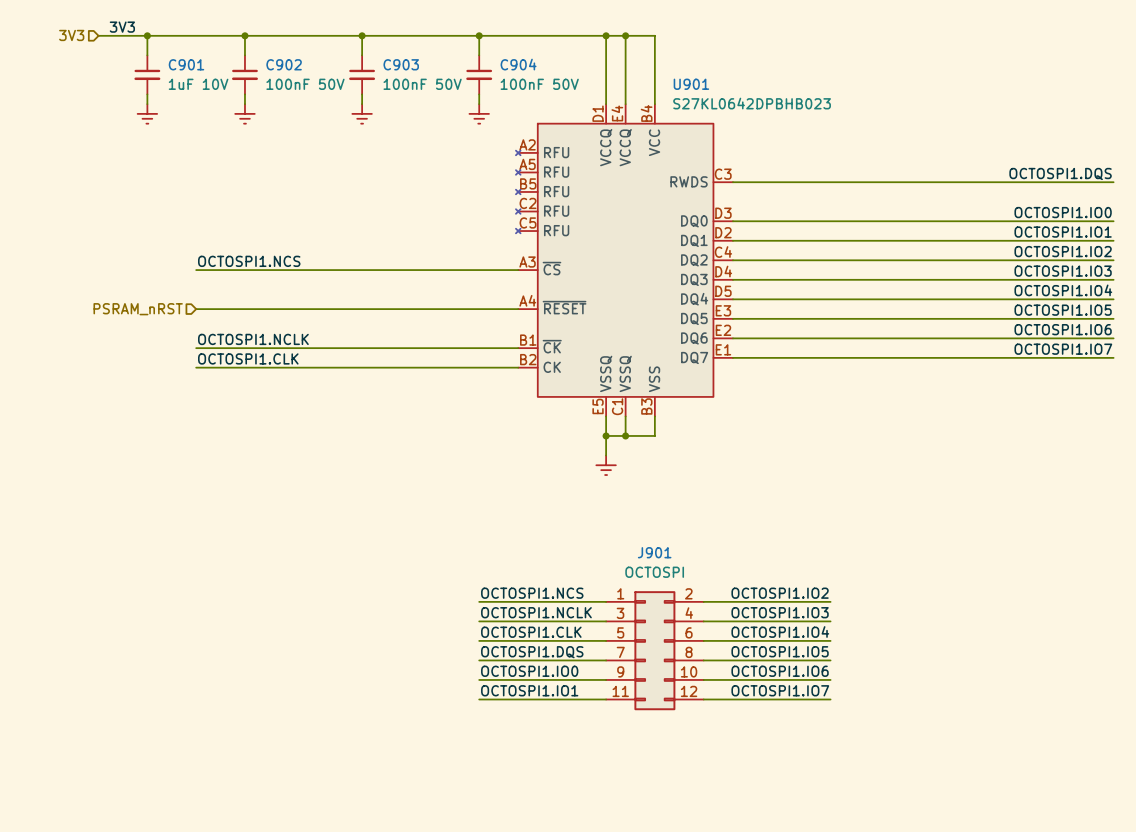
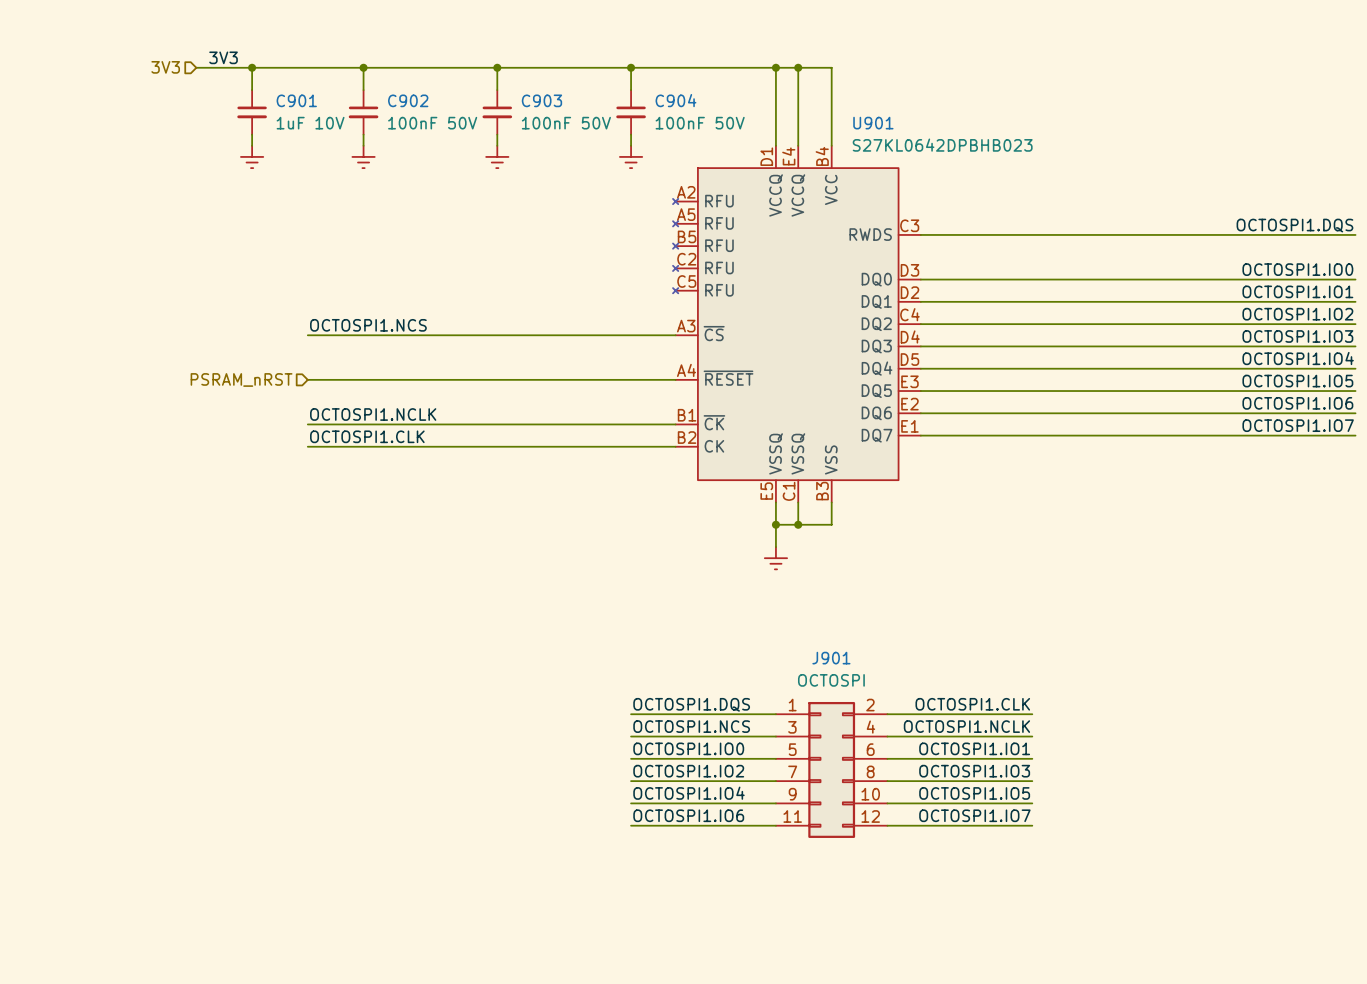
label: OCTOSPI1.NCS (532, 593) -> OCTOSPI1.DQS (691, 704)
label: OCTOSPI1.IO2 (780, 593) -> OCTOSPI1.CLK (972, 704)
label: OCTOSPI1.NCLK (536, 612) -> OCTOSPI1.NCS (691, 726)
label: OCTOSPI1.IO3 (780, 612) -> OCTOSPI1.NCLK (966, 726)
label: OCTOSPI1.IO4 (780, 631) -> OCTOSPI1.IO1 (974, 748)
label: OCTOSPI1.CLK (531, 632) -> OCTOSPI1.IO0 (688, 748)
label: OCTOSPI1.IO5 (780, 651) -> OCTOSPI1.IO3 (974, 771)
label: OCTOSPI1.DQS (532, 652) -> OCTOSPI1.IO2 (688, 771)
label: OCTOSPI1.IO0 (529, 671) -> OCTOSPI1.IO4 (688, 793)
label: OCTOSPI1.IO6 (780, 671) -> OCTOSPI1.IO5 (974, 793)
label: OCTOSPI1.IO1 (529, 690) -> OCTOSPI1.IO6 (688, 815)

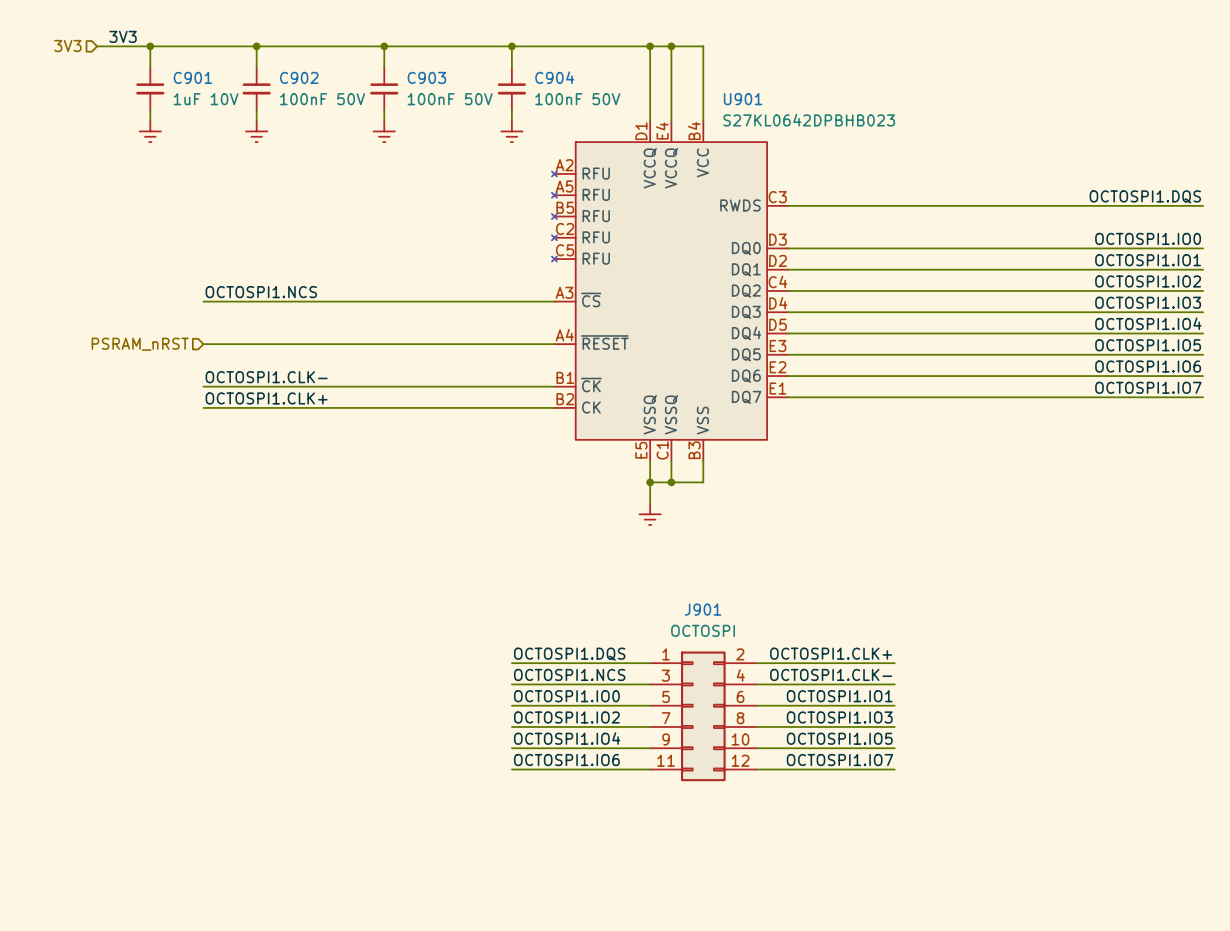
label: OCTOSPI1.NCLK (373, 414) -> OCTOSPI1.CLK- (266, 377)
label: OCTOSPI1.CLK (367, 436) -> OCTOSPI1.CLK+ (266, 398)
label: OCTOSPI1.CLK (972, 704) -> OCTOSPI1.CLK+ (831, 653)
label: OCTOSPI1.NCLK (966, 726) -> OCTOSPI1.CLK- (831, 674)

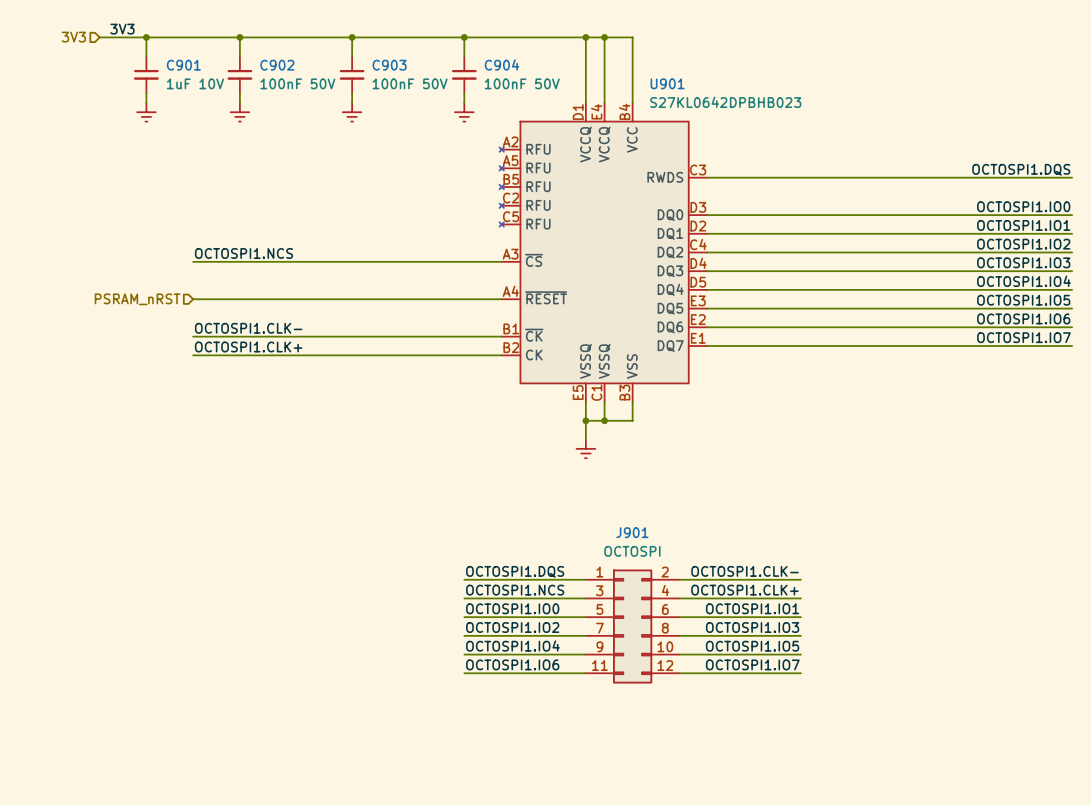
label: OCTOSPI1.CLK+ (831, 653) -> OCTOSPI1.CLK- (744, 571)
label: OCTOSPI1.CLK- (831, 674) -> OCTOSPI1.CLK+ (744, 590)

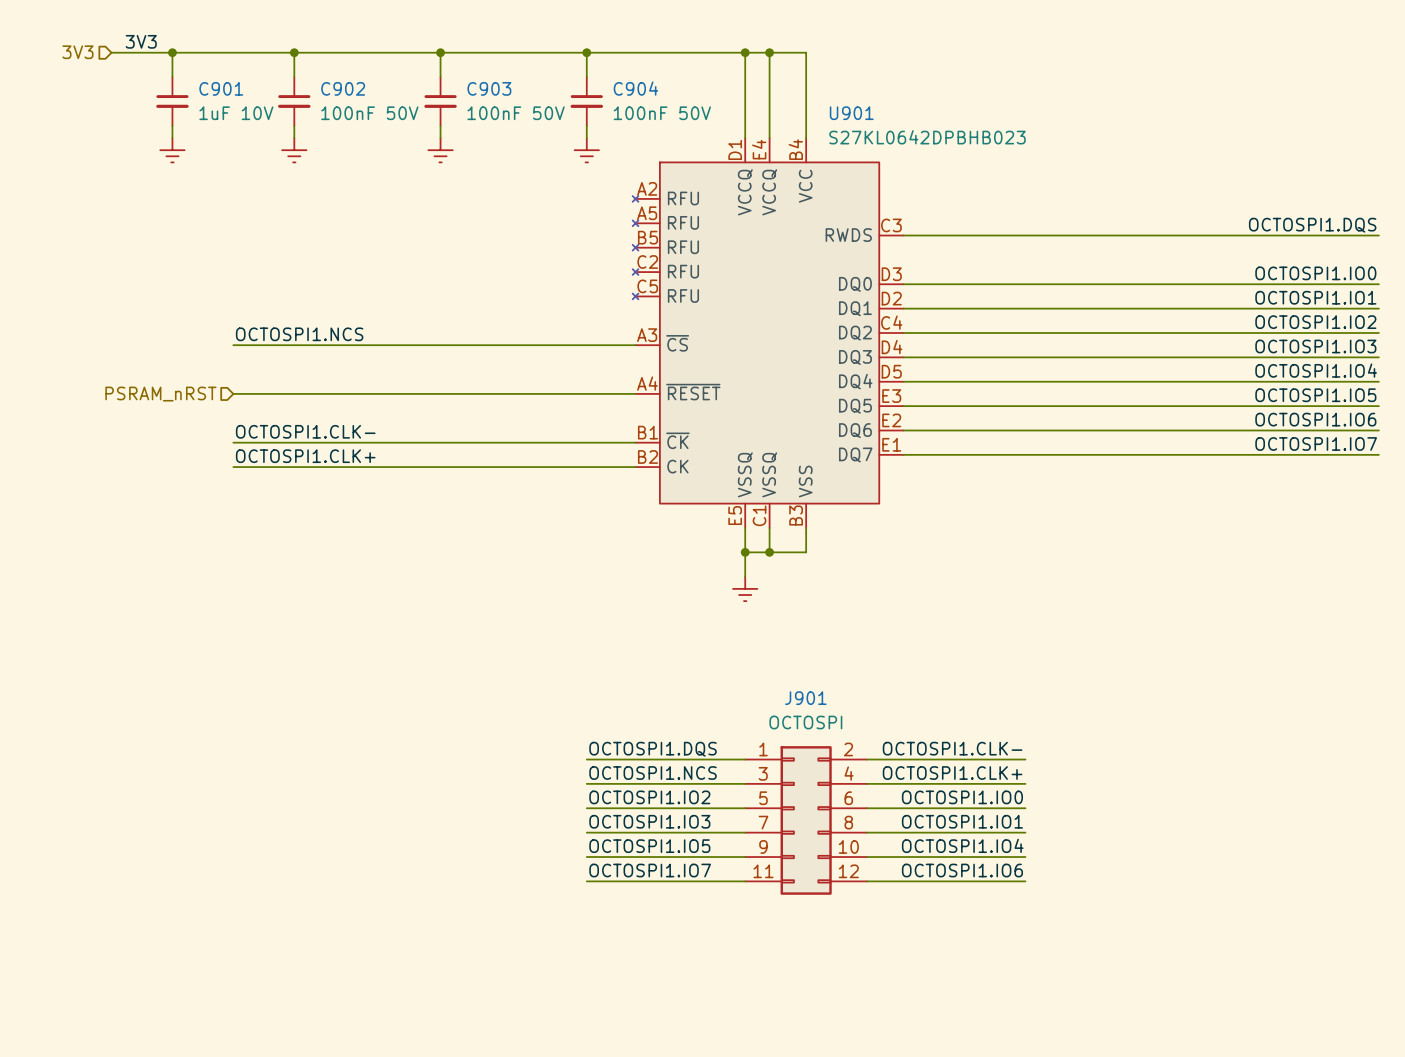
label: OCTOSPI1.IO0 (512, 608) -> OCTOSPI1.IO2 (649, 797)
label: OCTOSPI1.IO1 (752, 608) -> OCTOSPI1.IO0 (962, 797)
label: OCTOSPI1.IO2 (512, 627) -> OCTOSPI1.IO3 (649, 821)
label: OCTOSPI1.IO3 (752, 627) -> OCTOSPI1.IO1 (962, 821)
label: OCTOSPI1.IO4 (512, 645) -> OCTOSPI1.IO5 (649, 846)
label: OCTOSPI1.IO5 (752, 646) -> OCTOSPI1.IO4 (962, 845)
label: OCTOSPI1.IO6 (512, 664) -> OCTOSPI1.IO7 (650, 870)
label: OCTOSPI1.IO7 (752, 664) -> OCTOSPI1.IO6 (962, 870)

